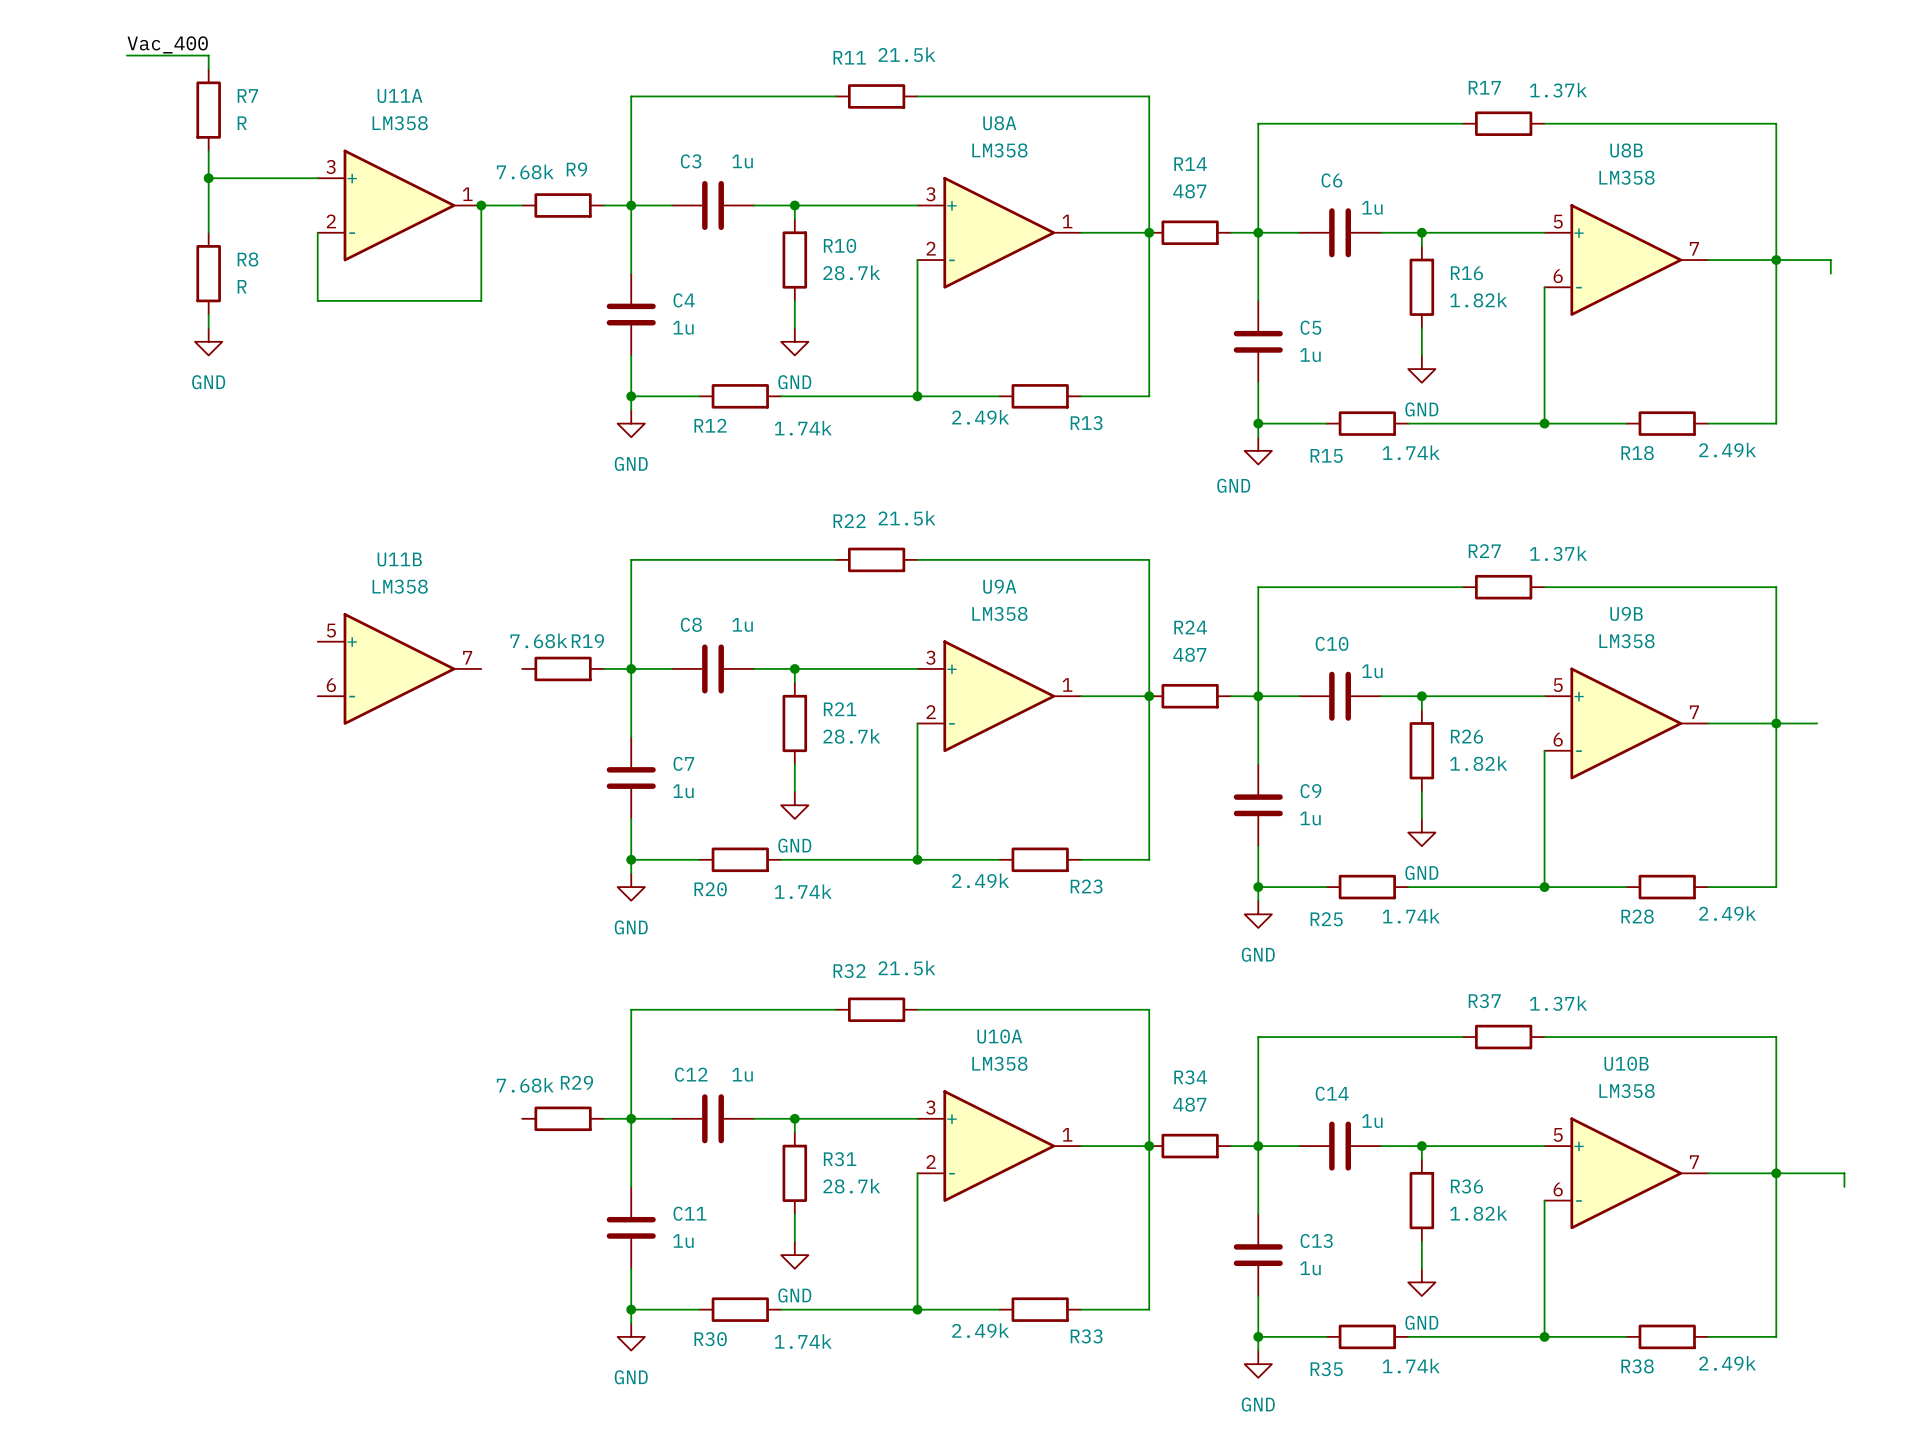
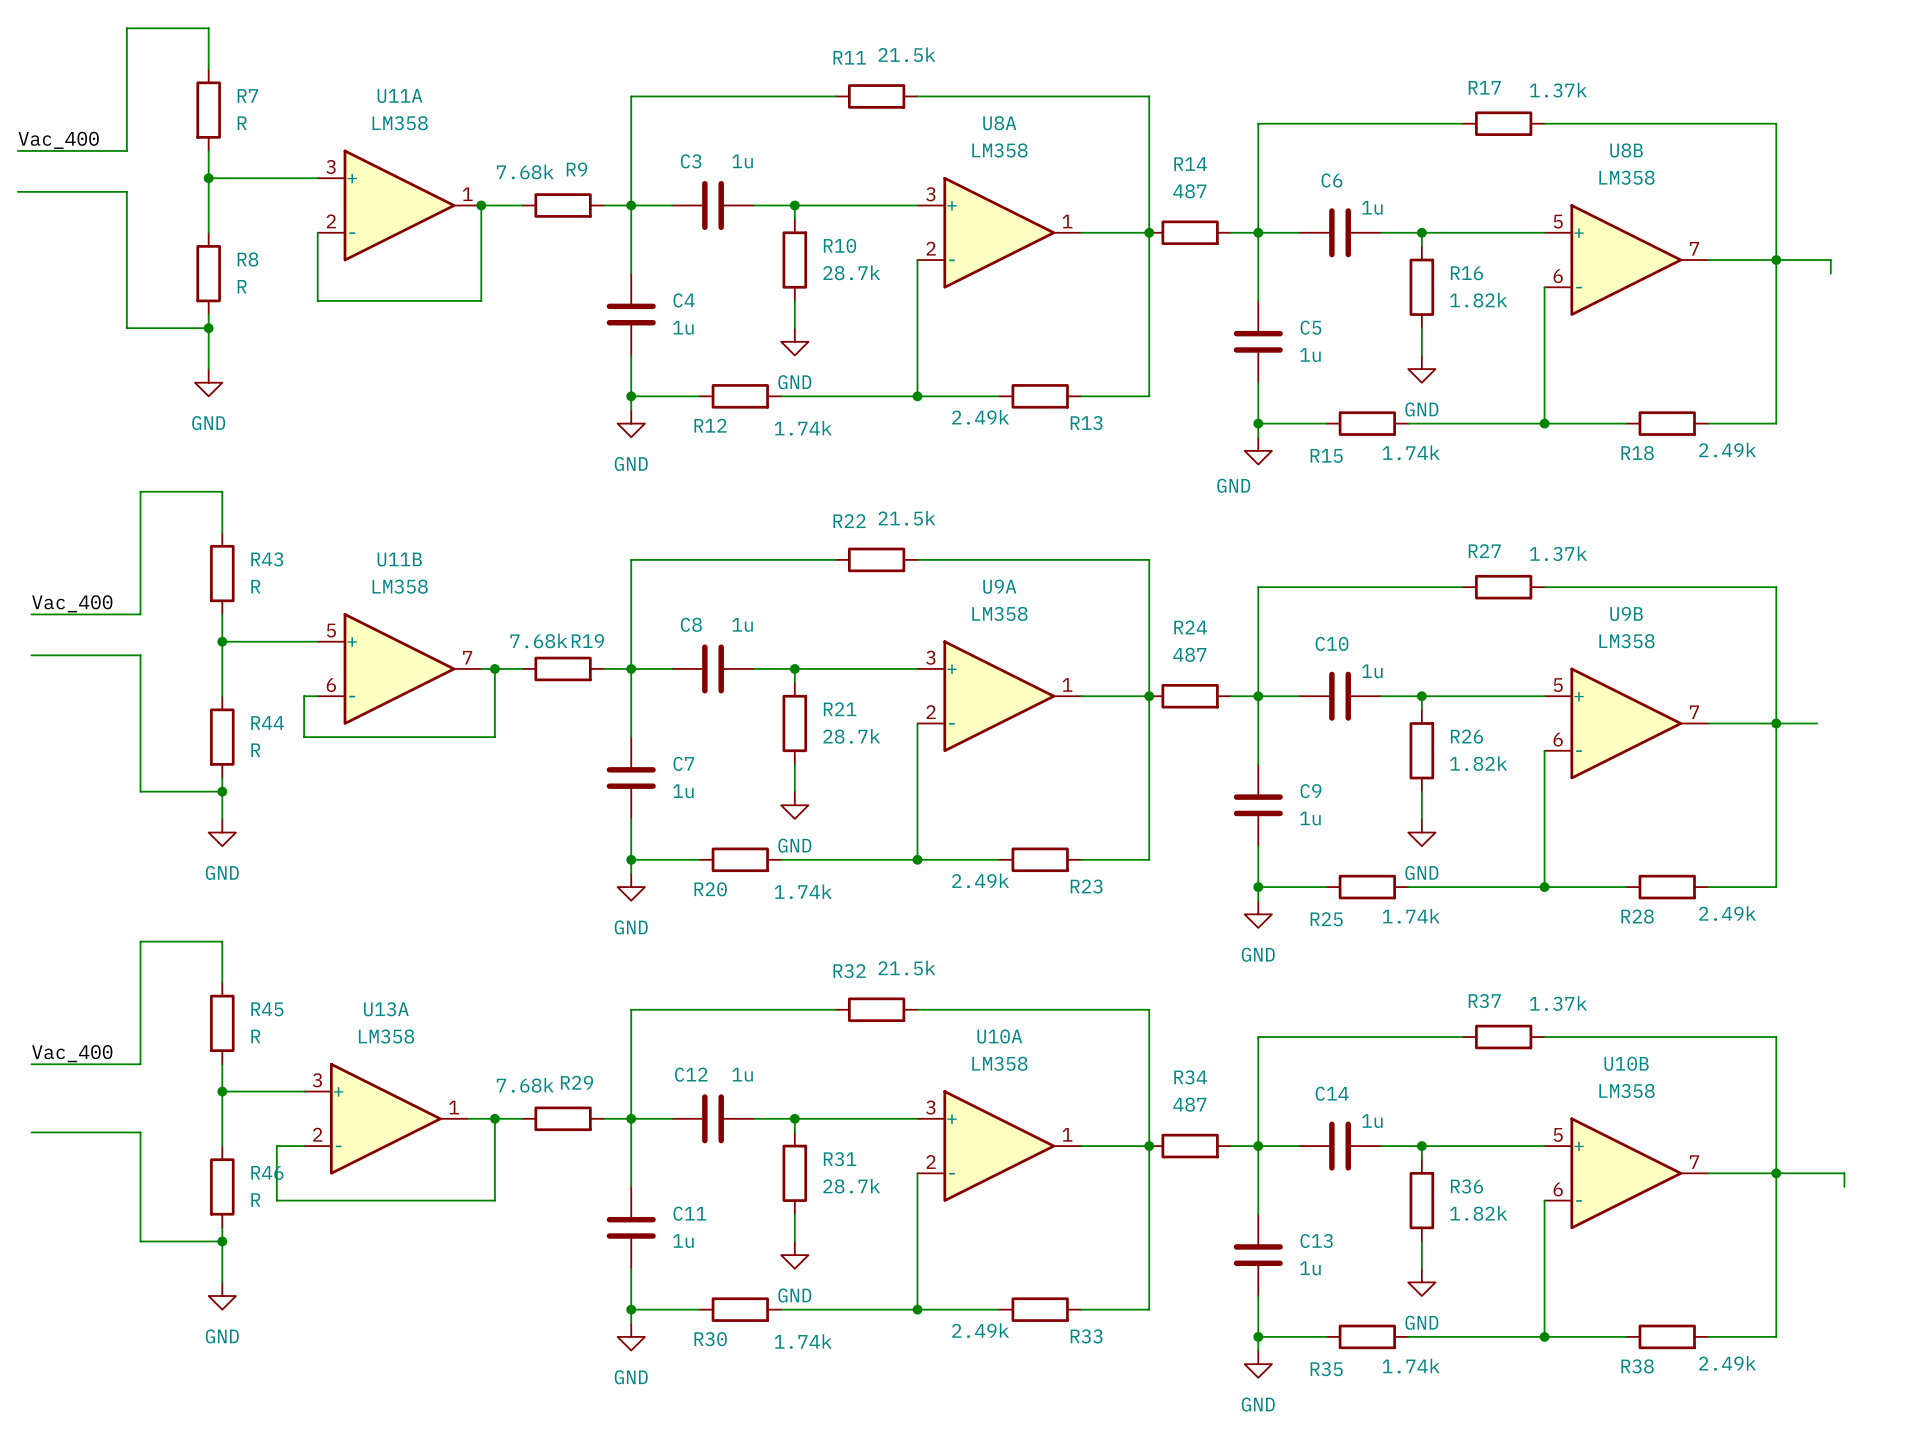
label position: Vac_400 (167, 44) -> Vac_400 (58, 140)
wire: (126, 55) (208, 55) -> (17, 150) (126, 150) (126, 28) (208, 28) (208, 55)
wire: none -> (17, 191) (126, 191) (126, 328) (208, 328) (208, 369)
junction: none -> (208, 328)
power symbol position: GND (208, 341) -> GND (208, 382)
wire: none -> (222, 532) (222, 491) (140, 491) (140, 614) (31, 614)
R43: none -> R (222, 573)
label: none -> Vac_400 (72, 603)
wire: none -> (222, 614) (222, 696)
wire: none -> (222, 641) (317, 641)
junction: none -> (222, 641)
wire: none -> (31, 655) (140, 655) (140, 791) (222, 791)
wire: none -> (481, 668) (522, 668)
wire: none -> (494, 668) (494, 737) (304, 737) (304, 696) (317, 696)
junction: none -> (494, 668)
R44: none -> R (222, 737)
wire: none -> (222, 778) (222, 818)
junction: none -> (222, 791)
power symbol: none -> GND (222, 832)
wire: none -> (222, 982) (222, 941) (140, 941) (140, 1064) (31, 1064)
R45: none -> R (222, 1023)
label: none -> Vac_400 (72, 1053)
wire: none -> (222, 1064) (222, 1146)
wire: none -> (222, 1091) (304, 1091)
junction: none -> (222, 1091)
U13A: none -> LM358 (385, 1118)
wire: none -> (467, 1118) (522, 1118)
wire: none -> (494, 1118) (494, 1200) (276, 1200) (276, 1146) (304, 1146)
junction: none -> (494, 1118)
wire: none -> (31, 1132) (140, 1132) (140, 1241) (222, 1241)
R46: none -> R (222, 1186)
wire: none -> (222, 1227) (222, 1282)
junction: none -> (222, 1241)
power symbol: none -> GND (222, 1296)

